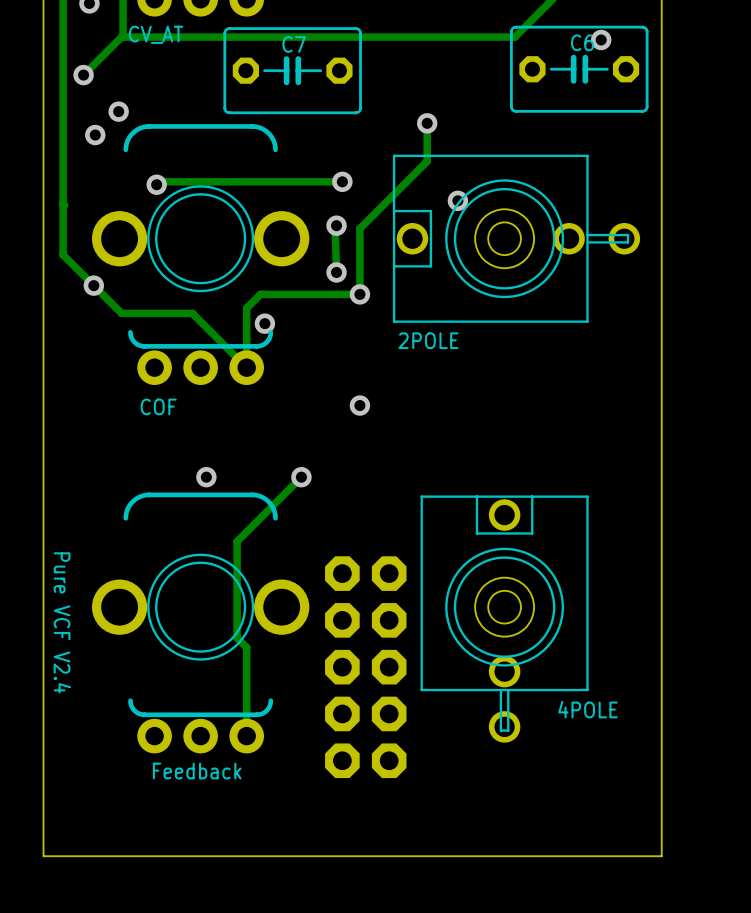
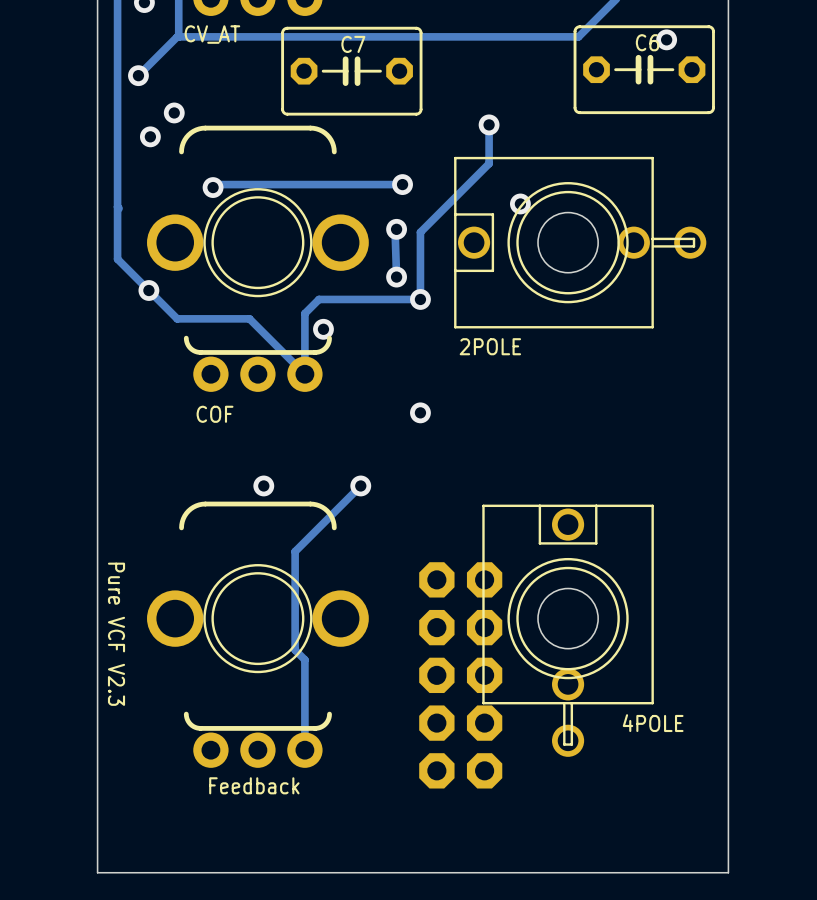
2POLE footprint: [392, 154, 641, 323] -> [454, 156, 707, 329]
4POLE footprint: [420, 495, 589, 743] -> [482, 504, 654, 757]
text: Pure VCF V2.4 (62, 622) -> Pure VCF V2.3 (116, 634)
part position: (365, 667) -> (460, 675)

